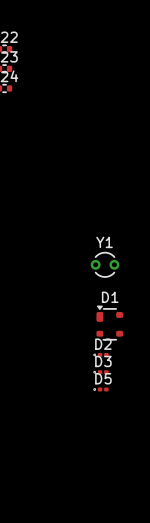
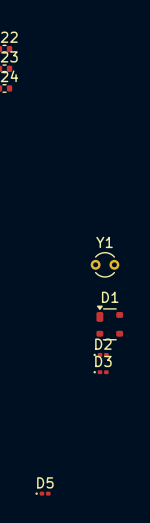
D5 position: (101, 389) -> (43, 493)

